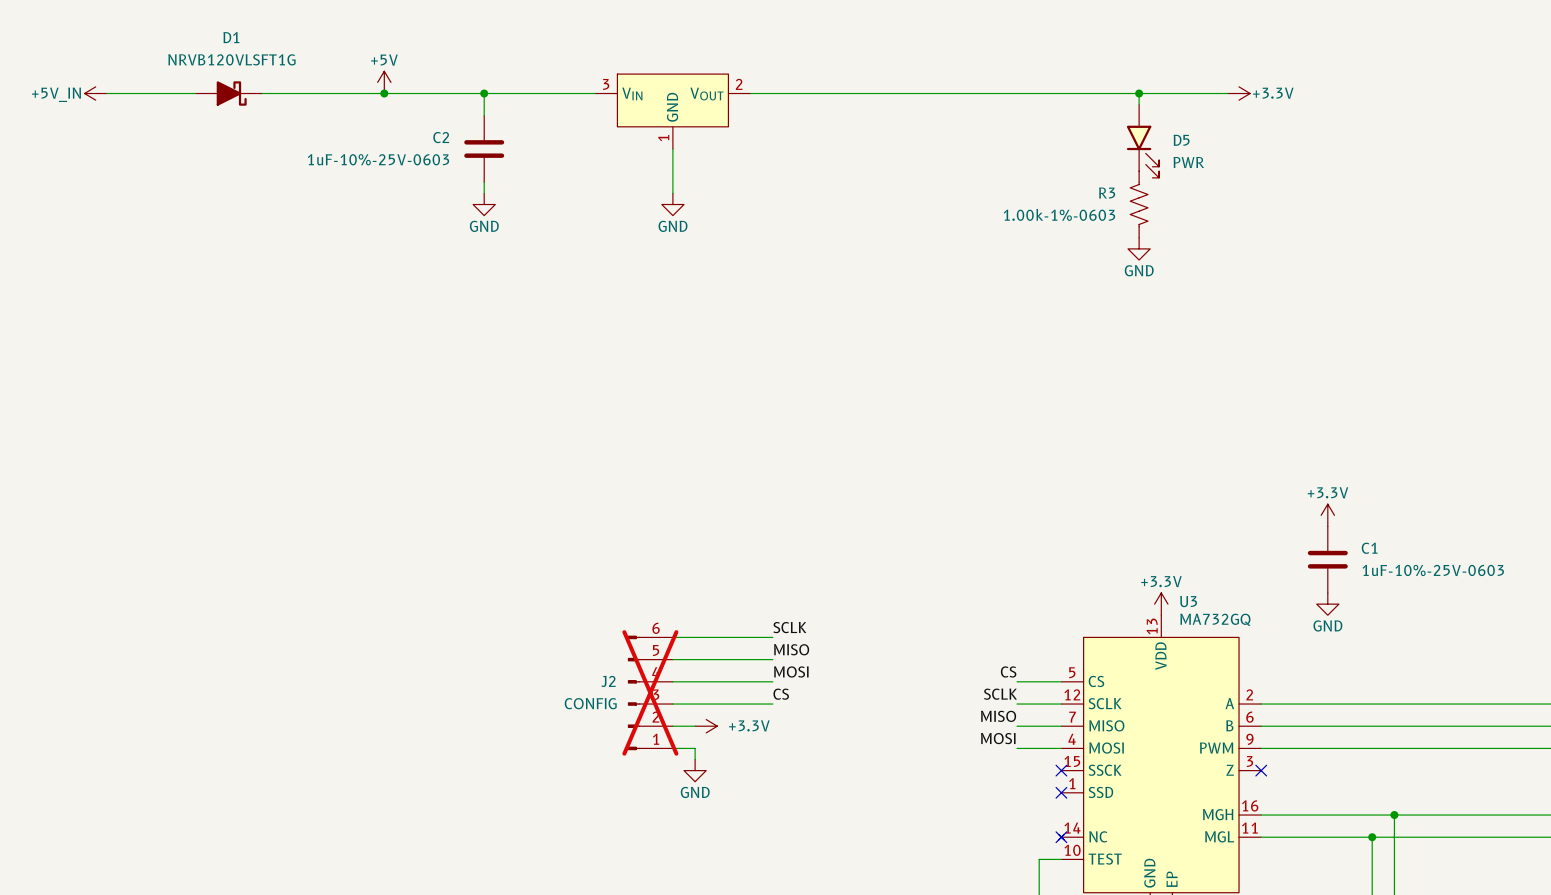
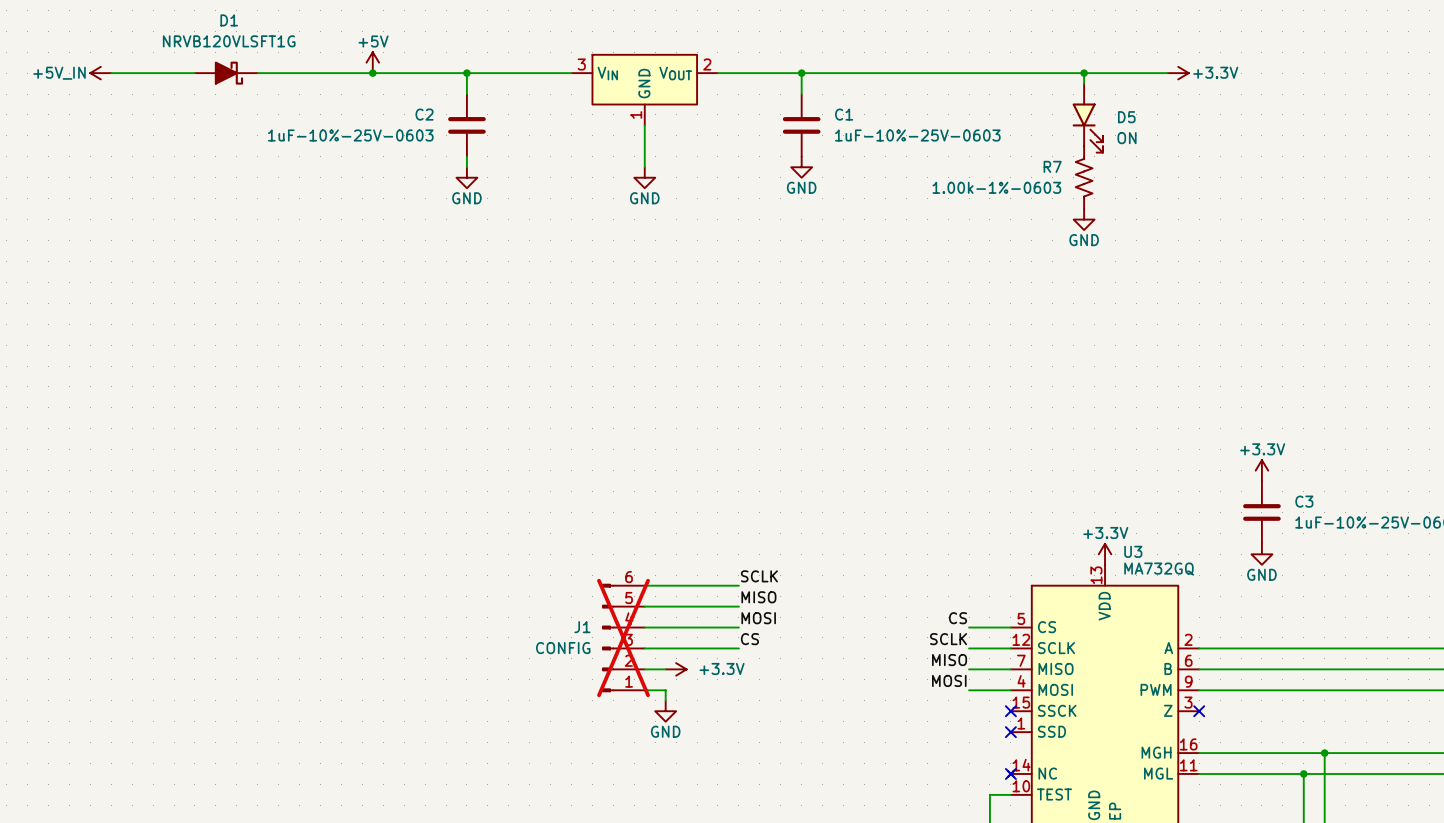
wire: none -> (801, 73) (801, 94)
junction: none -> (801, 73)
C1: none -> 1uF-10%-25V-0603 (801, 125)
D5 value: PWR (1188, 162) -> ON (1127, 138)
power symbol: none -> GND (801, 167)
R3 name: R3 (1107, 193) -> R7 (1052, 166)
C1 name: C1 (1369, 548) -> C3 (1304, 501)
J2 name: J2 (608, 681) -> J1 (582, 627)

